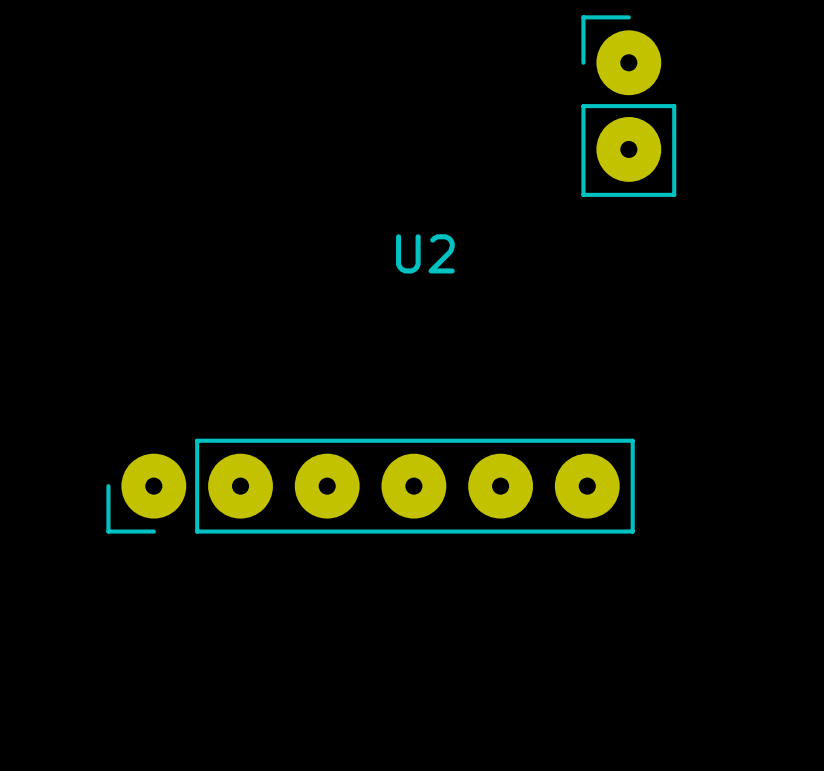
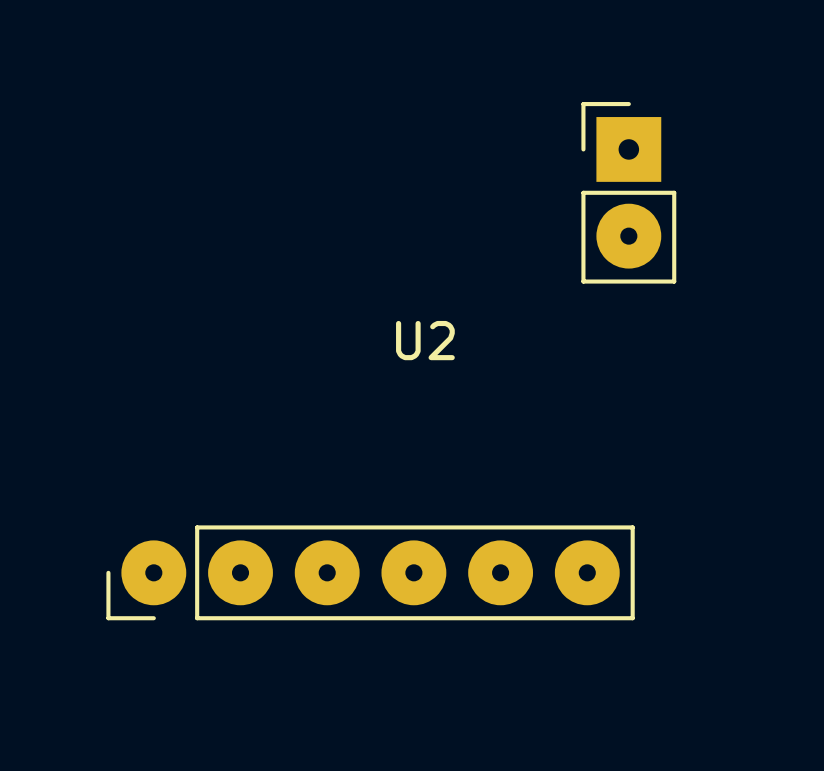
U2 footprint: [106, 15, 677, 534] -> [106, 102, 677, 621]

